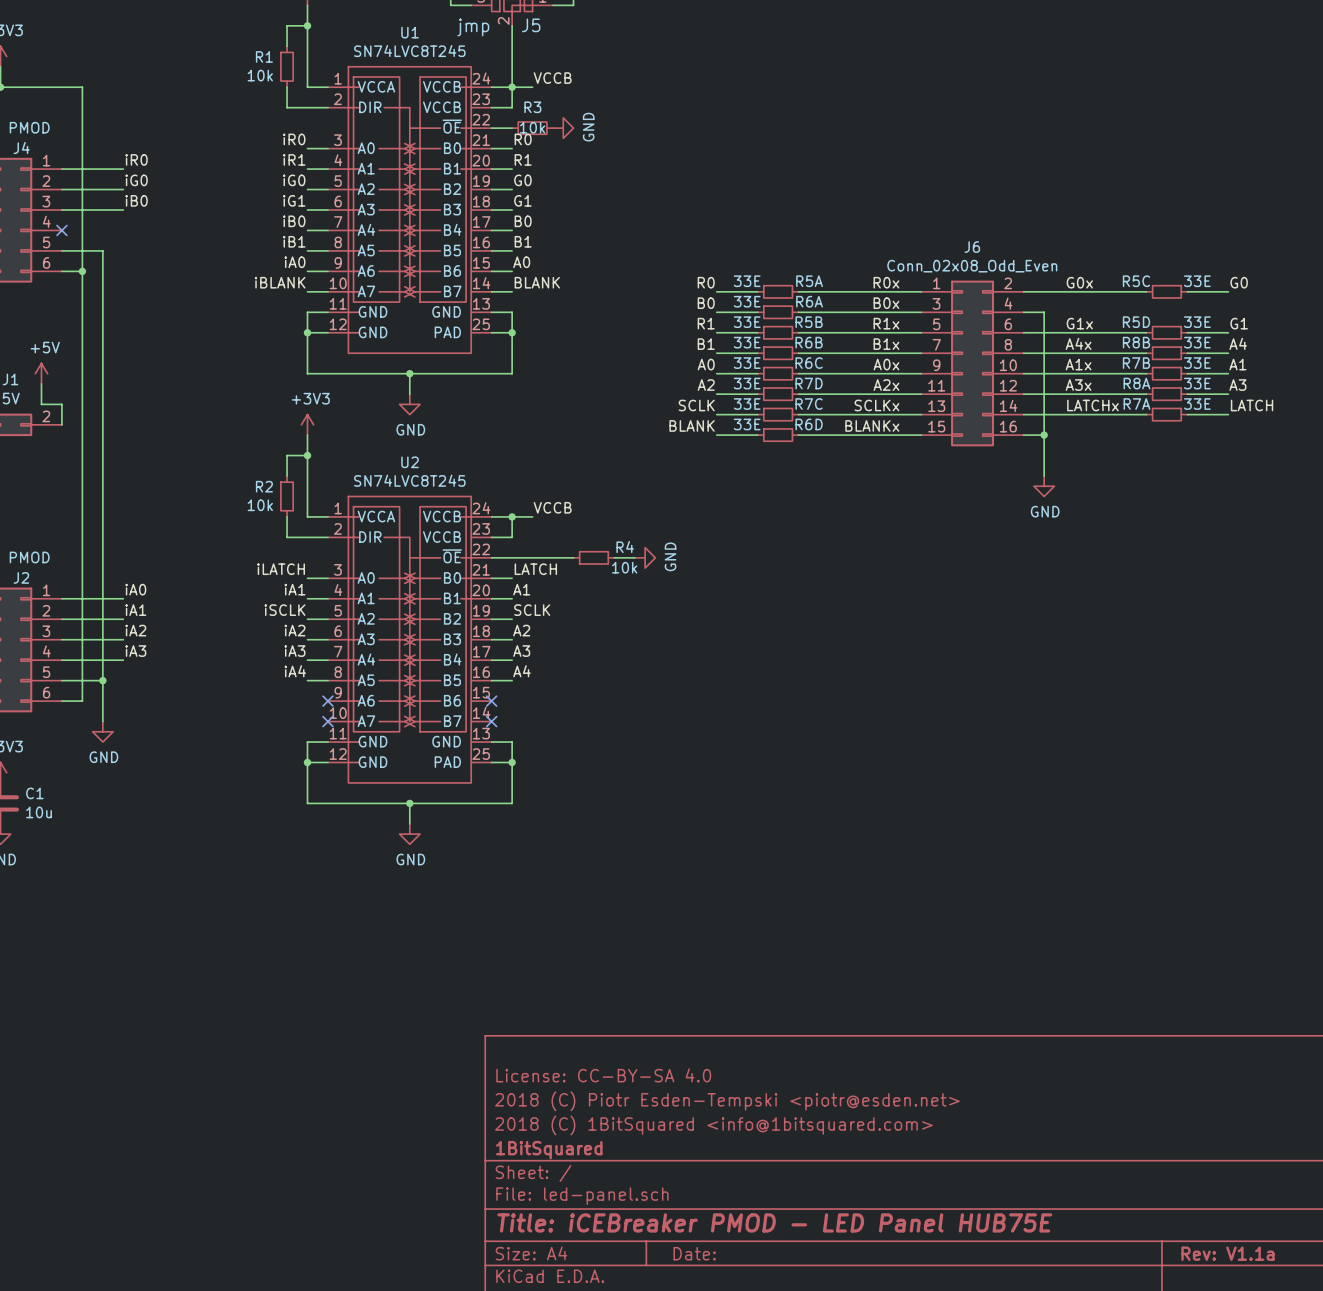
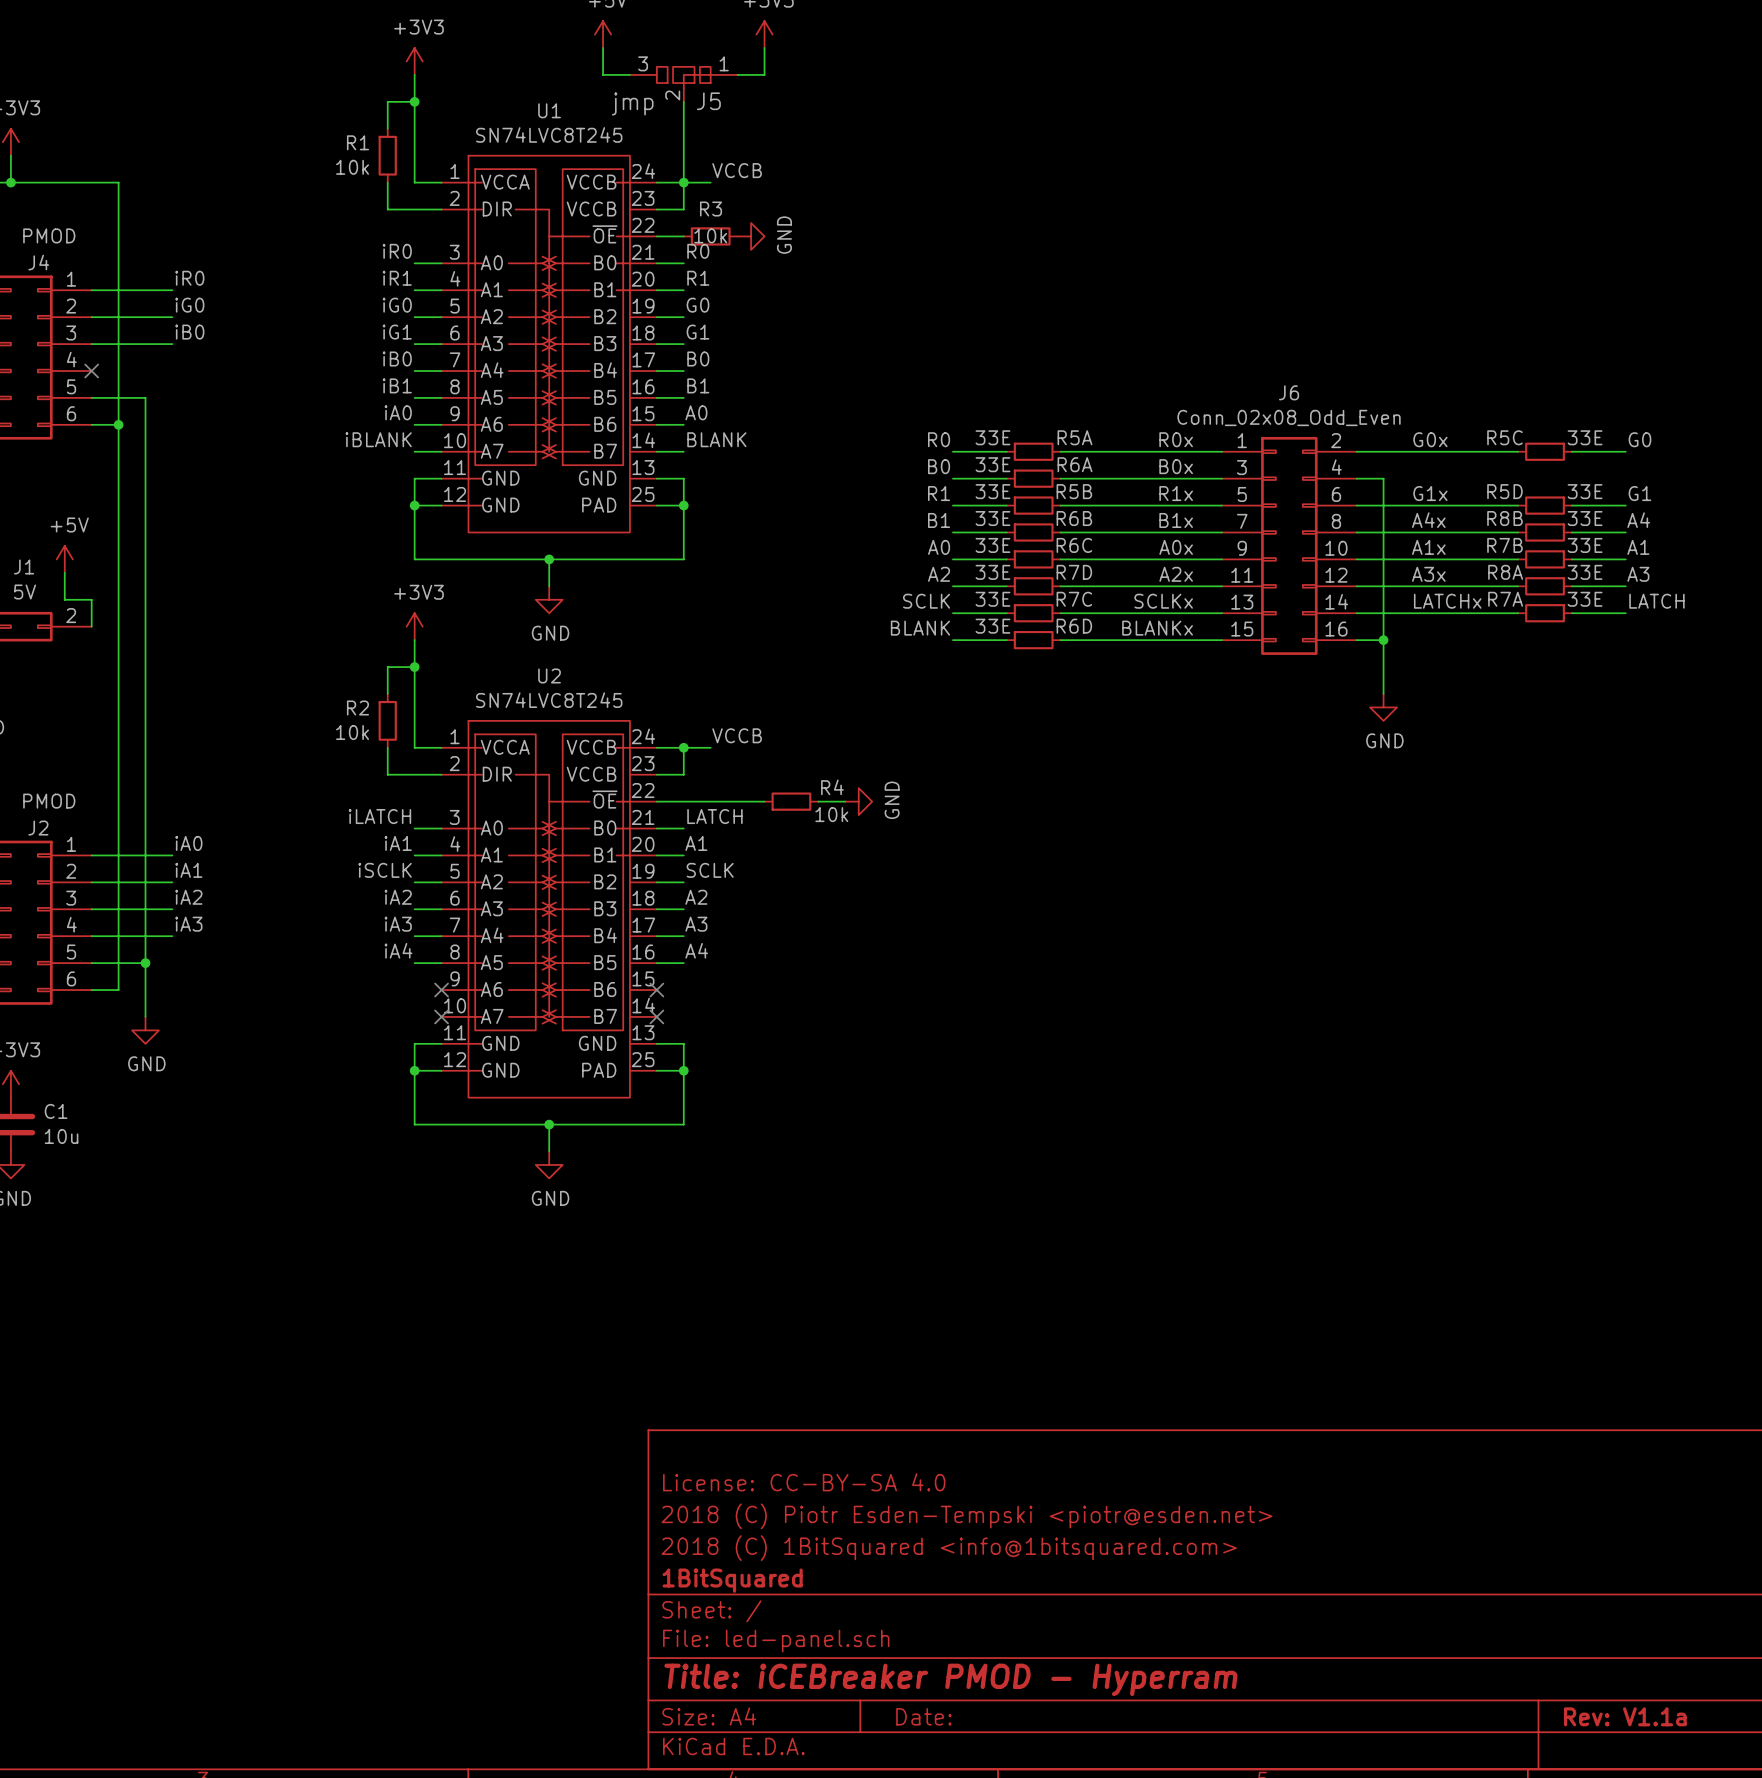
title block: Title: iCEBreaker PMOD - LED Panel HUB75E (774, 1222) -> Title: iCEBreaker PMOD - Hyperram (950, 1679)

